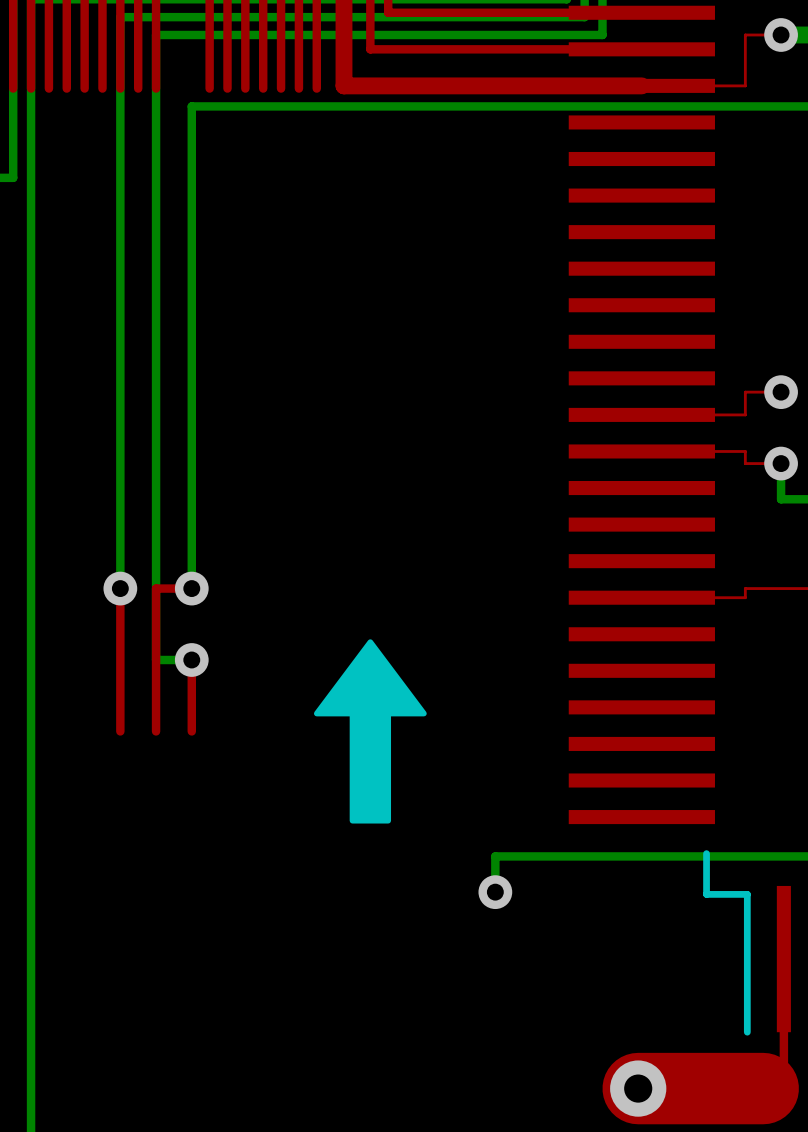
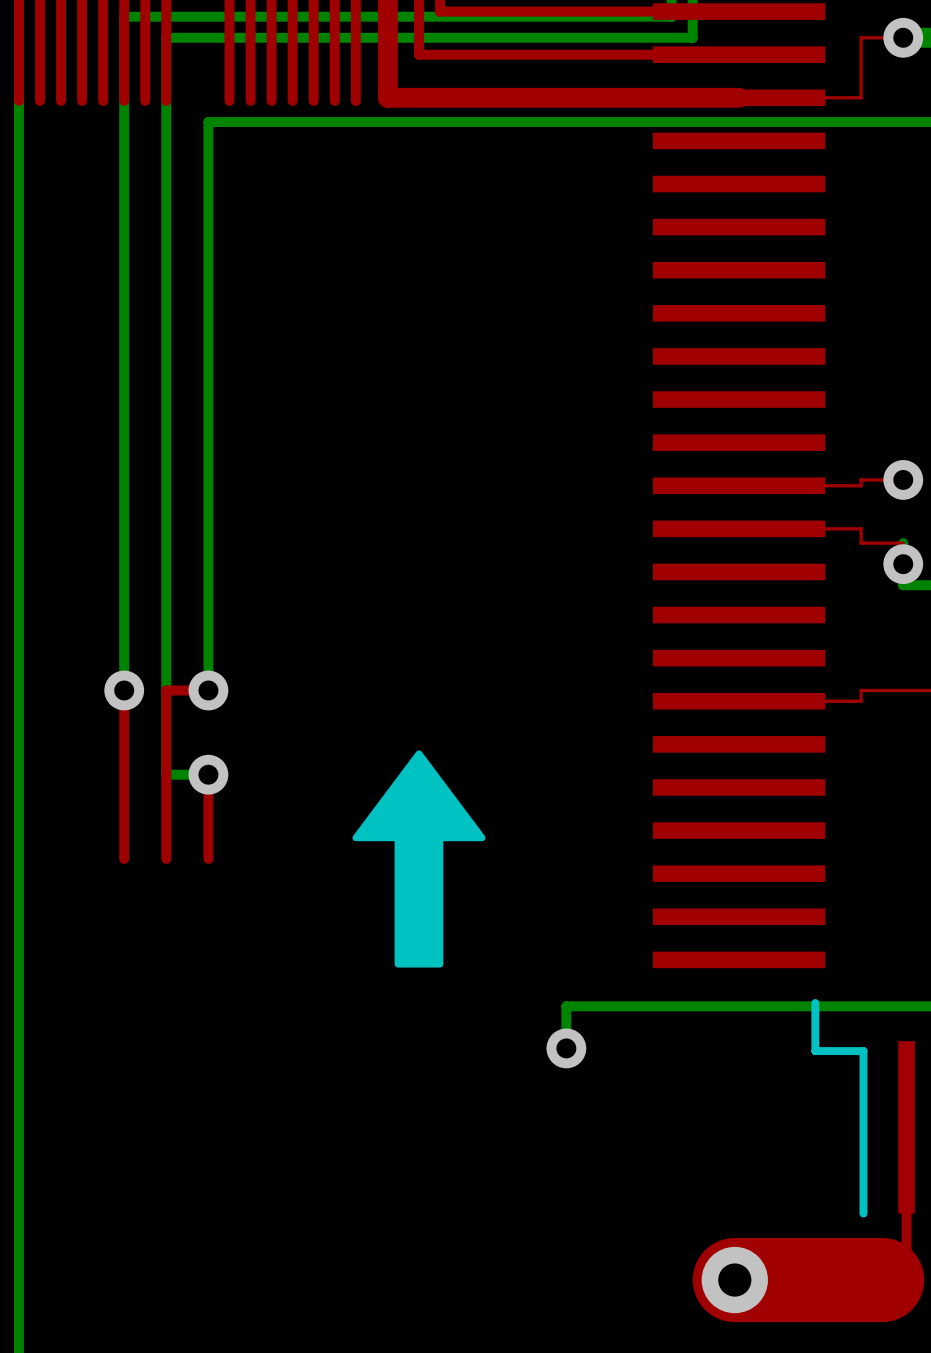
top track: (781, 392) (745, 392) (745, 409) -> (903, 479) (861, 479)
via position: (781, 392) -> (903, 479)
via position: (781, 463) -> (903, 564)

